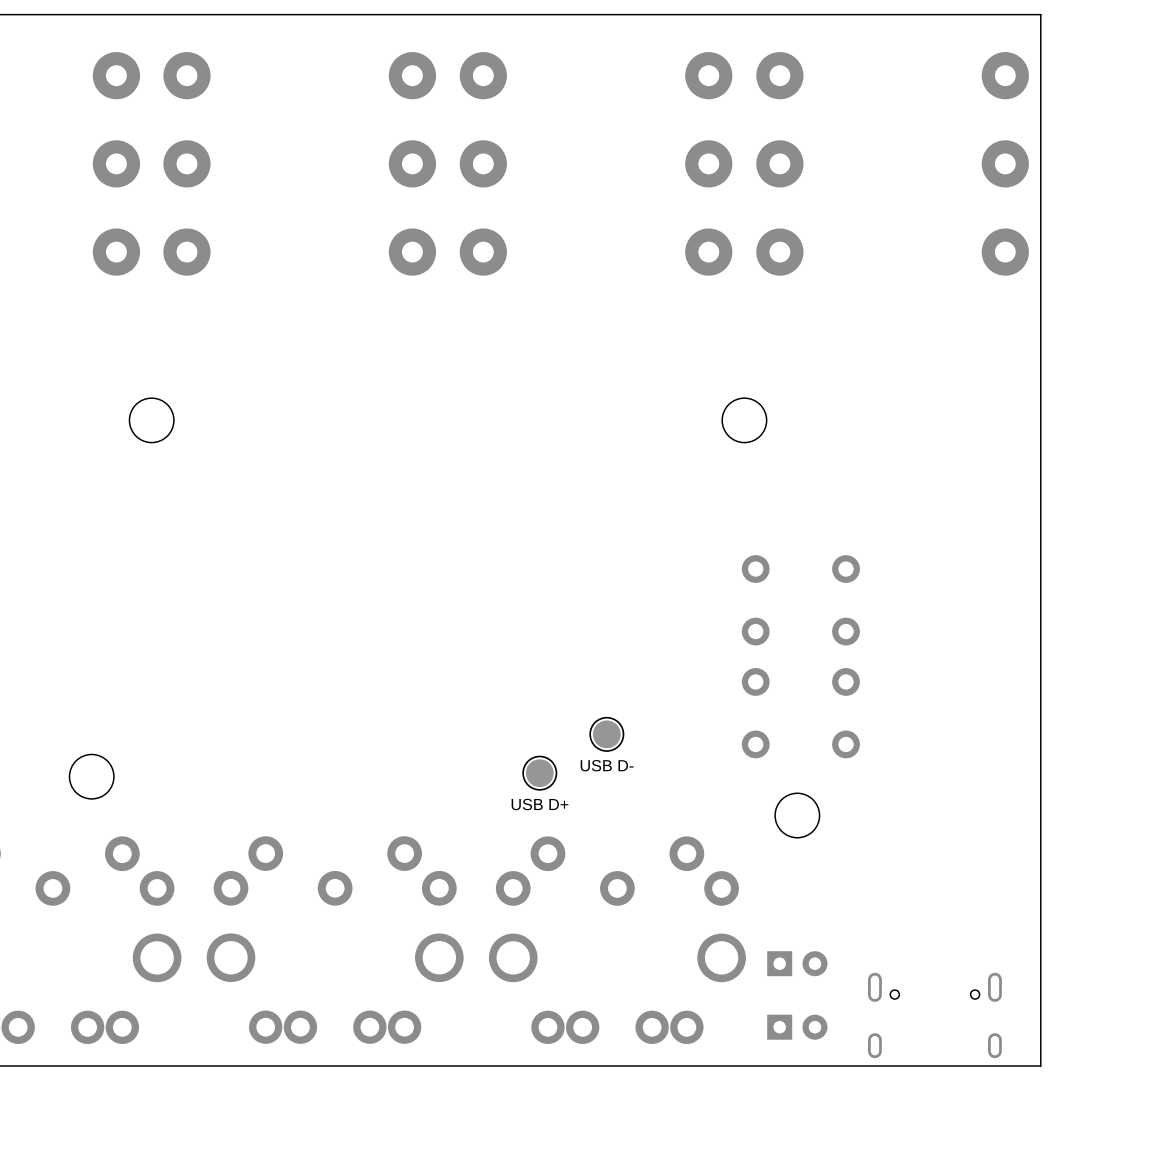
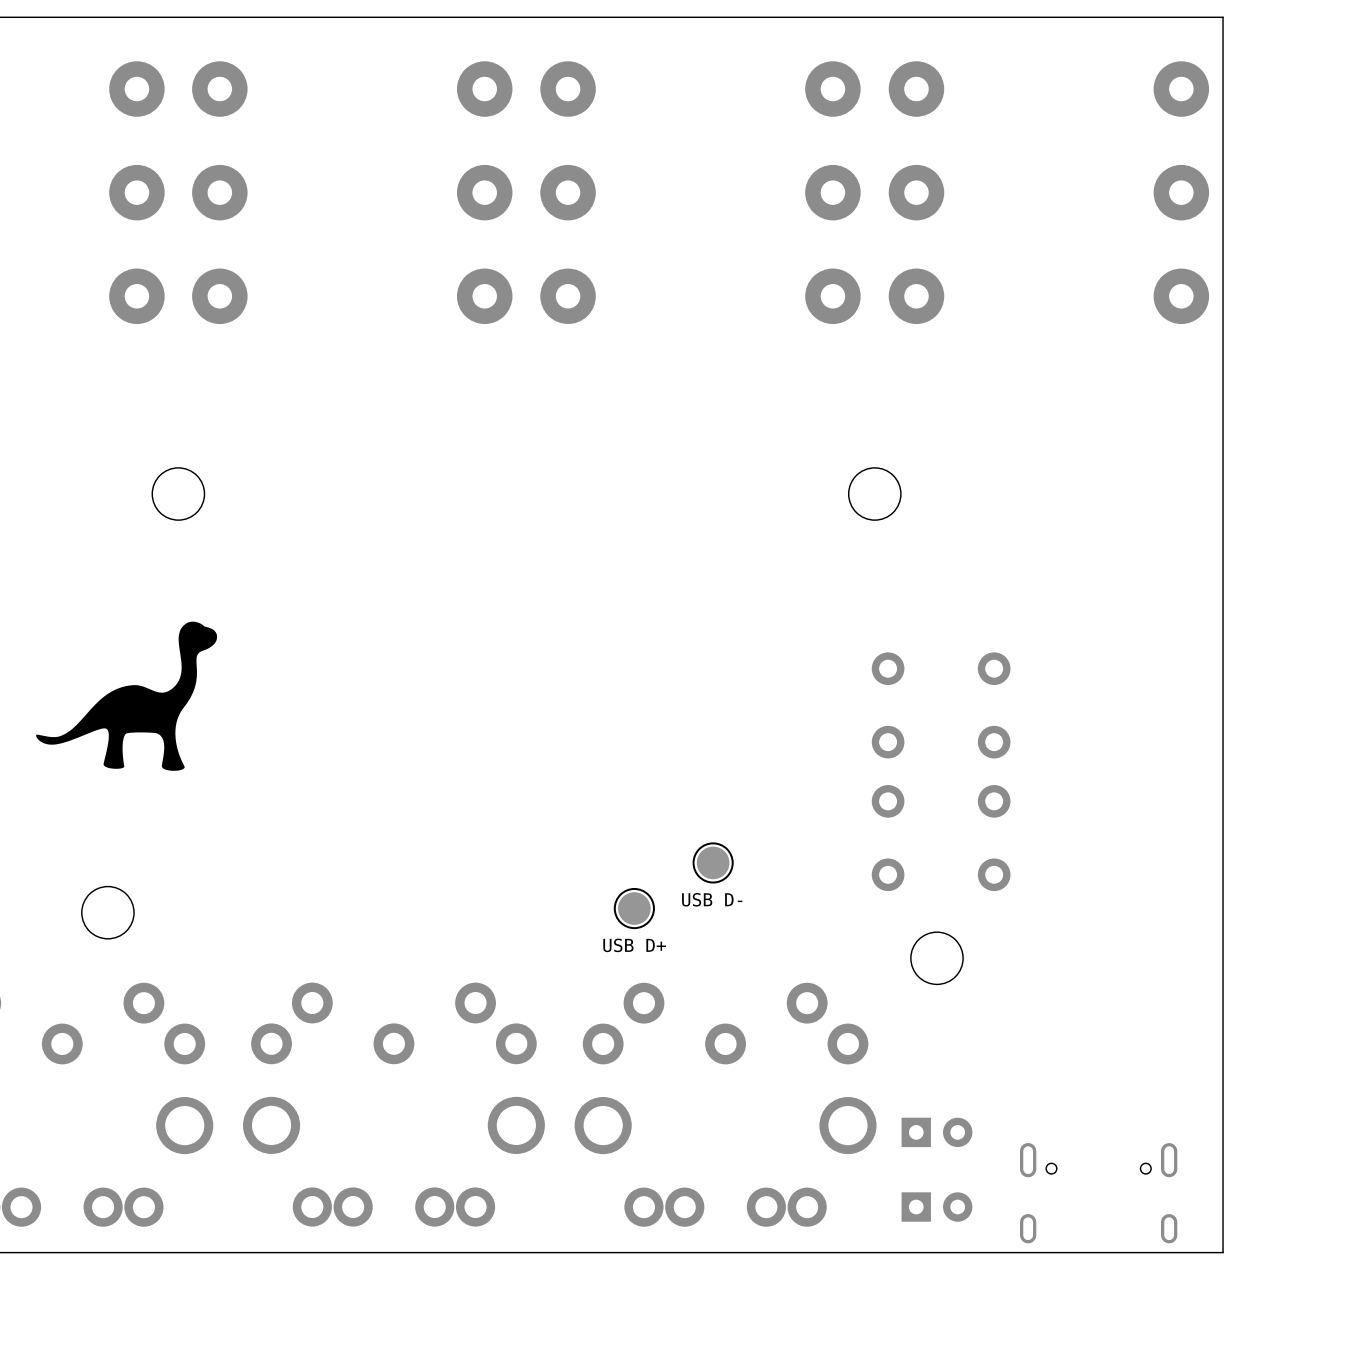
drawing: none -> [36, 621, 218, 771]

